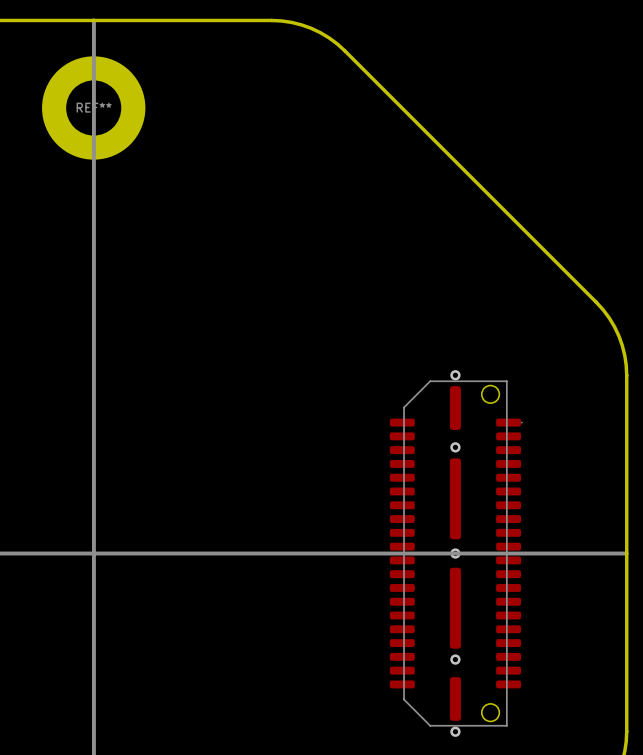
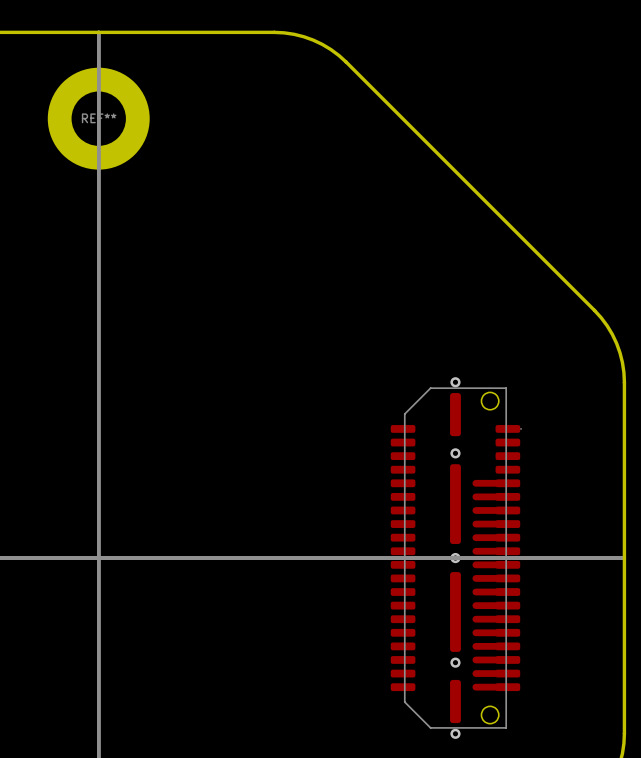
track: none -> (475, 483) (507, 483)
track: none -> (475, 496) (507, 496)
track: none -> (475, 510) (507, 510)
track: none -> (475, 524) (507, 524)
track: none -> (475, 537) (507, 537)
track: none -> (475, 551) (507, 551)
track: none -> (475, 564) (507, 564)
track: none -> (475, 578) (507, 578)
track: none -> (475, 592) (507, 592)
track: none -> (475, 605) (507, 605)
track: none -> (475, 619) (507, 619)
track: none -> (475, 632) (507, 632)
track: none -> (475, 646) (507, 646)
track: none -> (475, 659) (507, 659)
track: none -> (475, 673) (507, 673)
track: none -> (475, 687) (507, 687)

